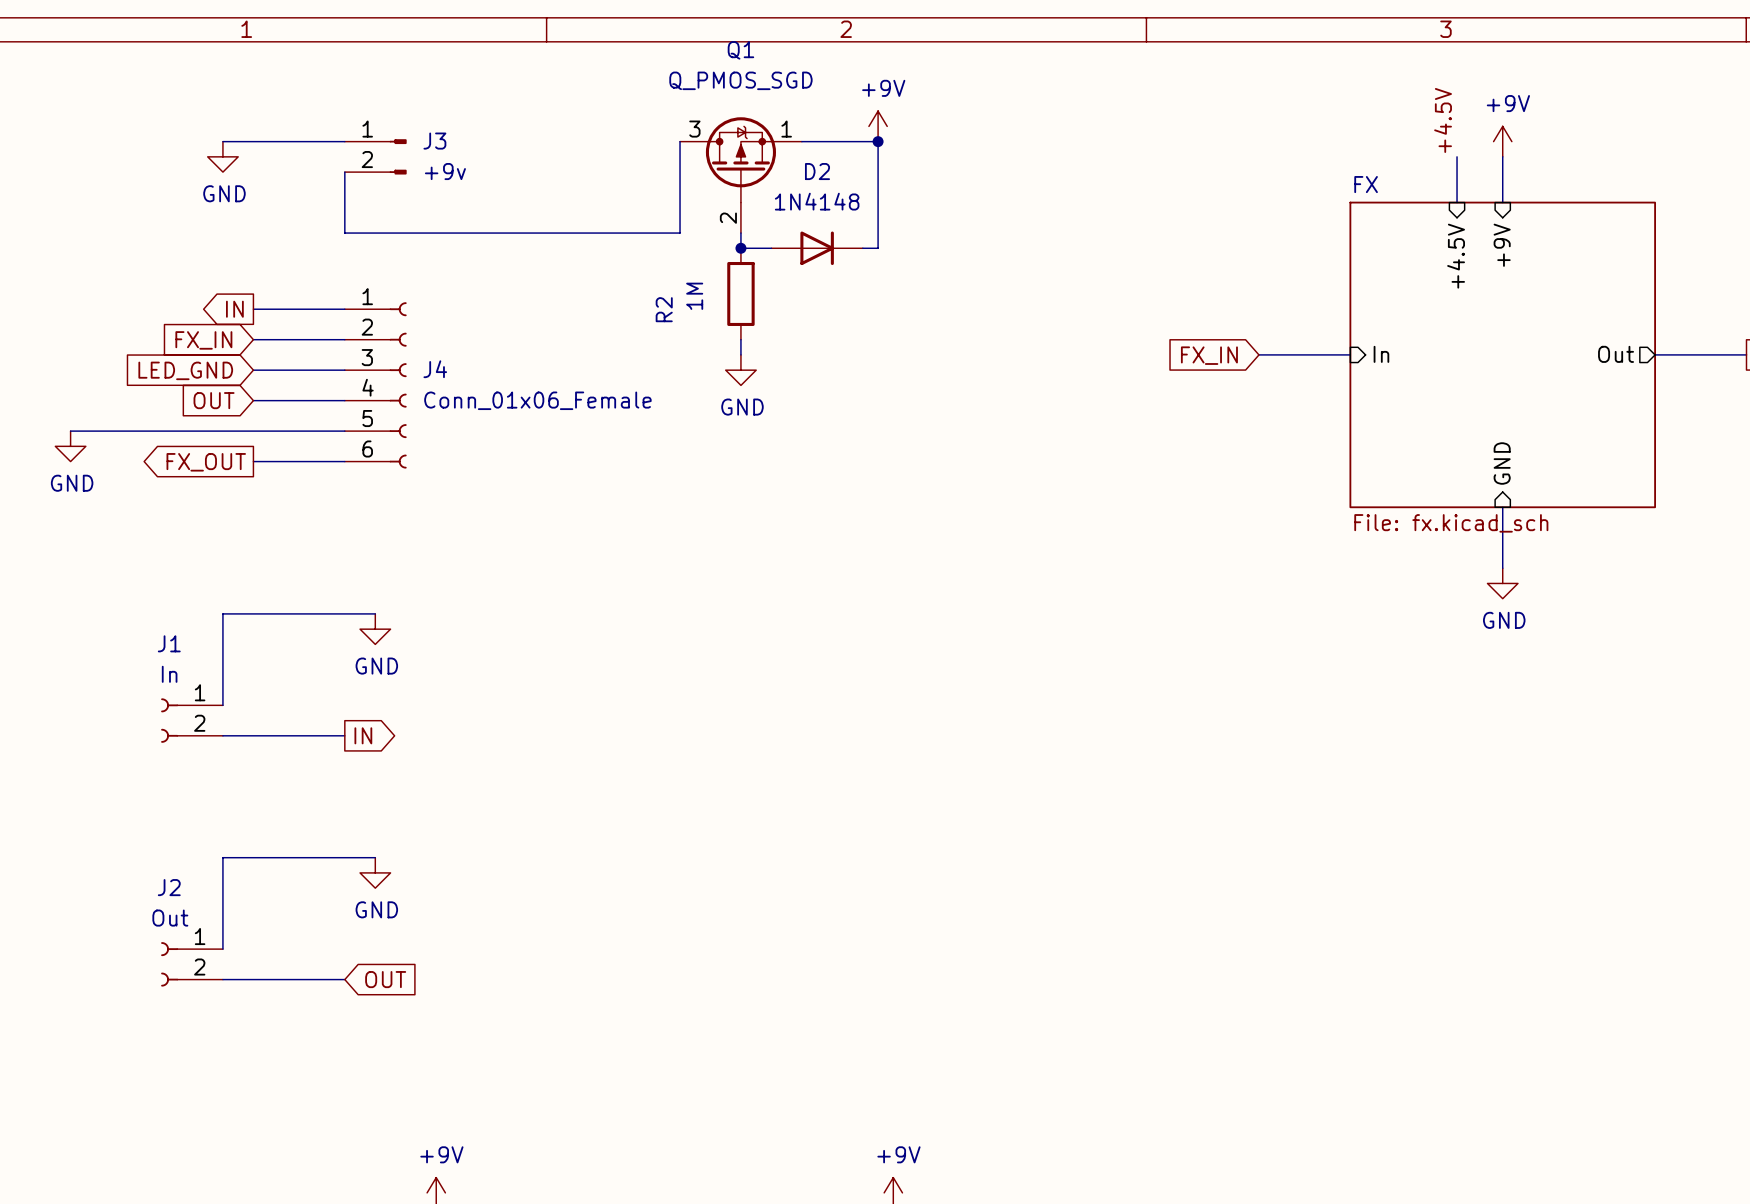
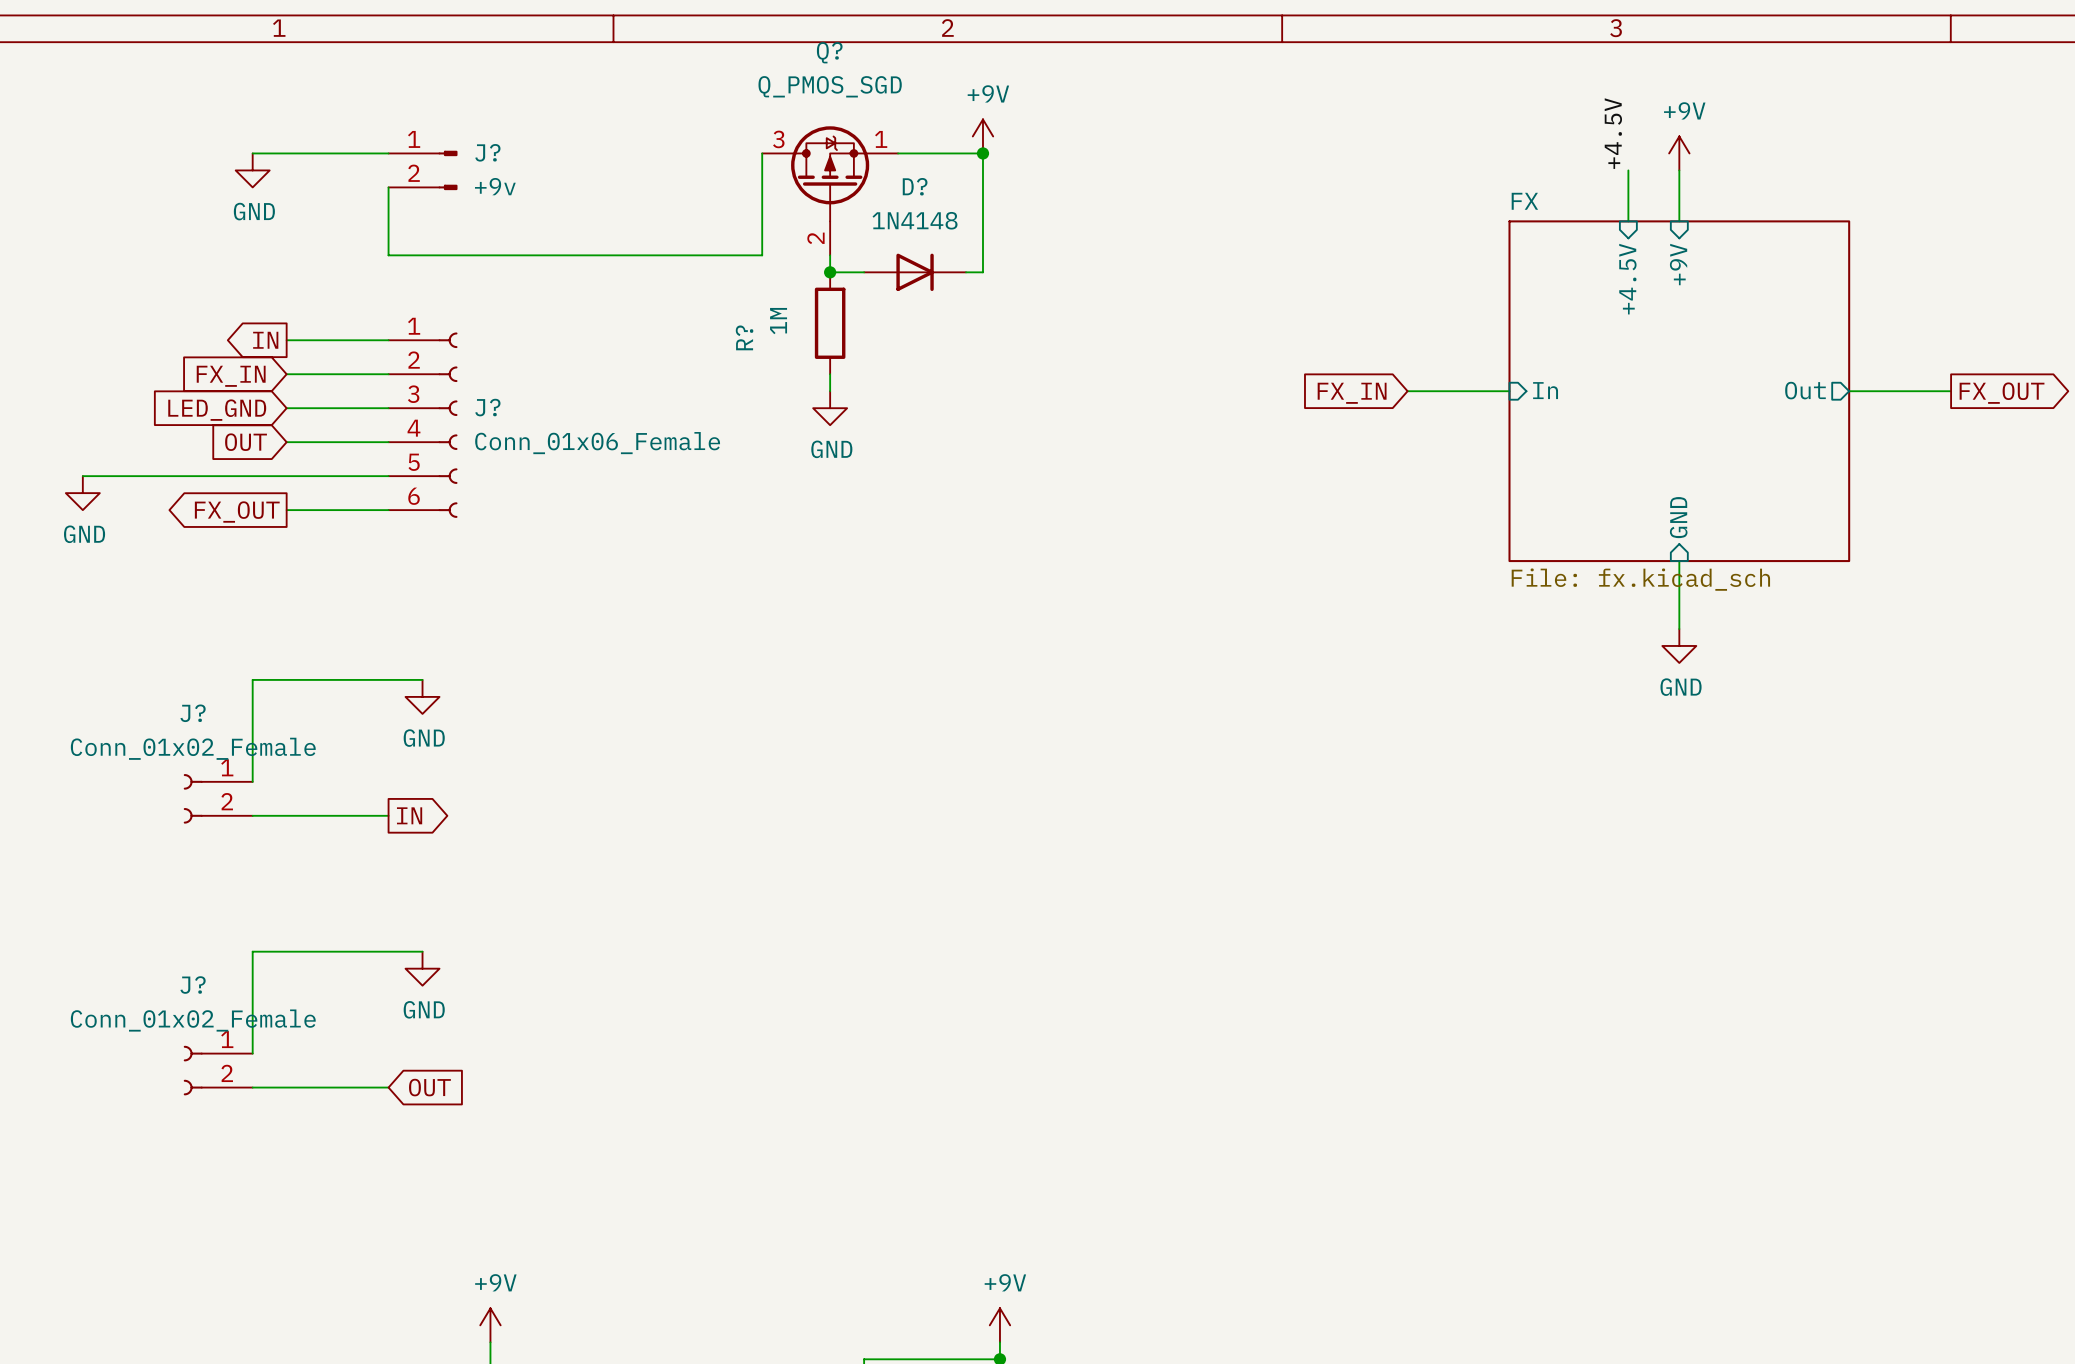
Q1 name: Q1 (740, 50) -> Q? (829, 52)
J3 name: J3 (434, 141) -> J? (487, 152)
D2 name: D2 (817, 171) -> D? (915, 186)
R2 name: R2 (664, 309) -> R? (744, 337)
J4 name: J4 (435, 369) -> J? (487, 407)
J1 name: J1 (169, 643) -> J? (193, 713)
J1 value: In (169, 674) -> Conn_01x02_Female (193, 748)
J2 name: J2 (169, 887) -> J? (193, 985)
J2 value: Out (170, 918) -> Conn_01x02_Female (193, 1020)

